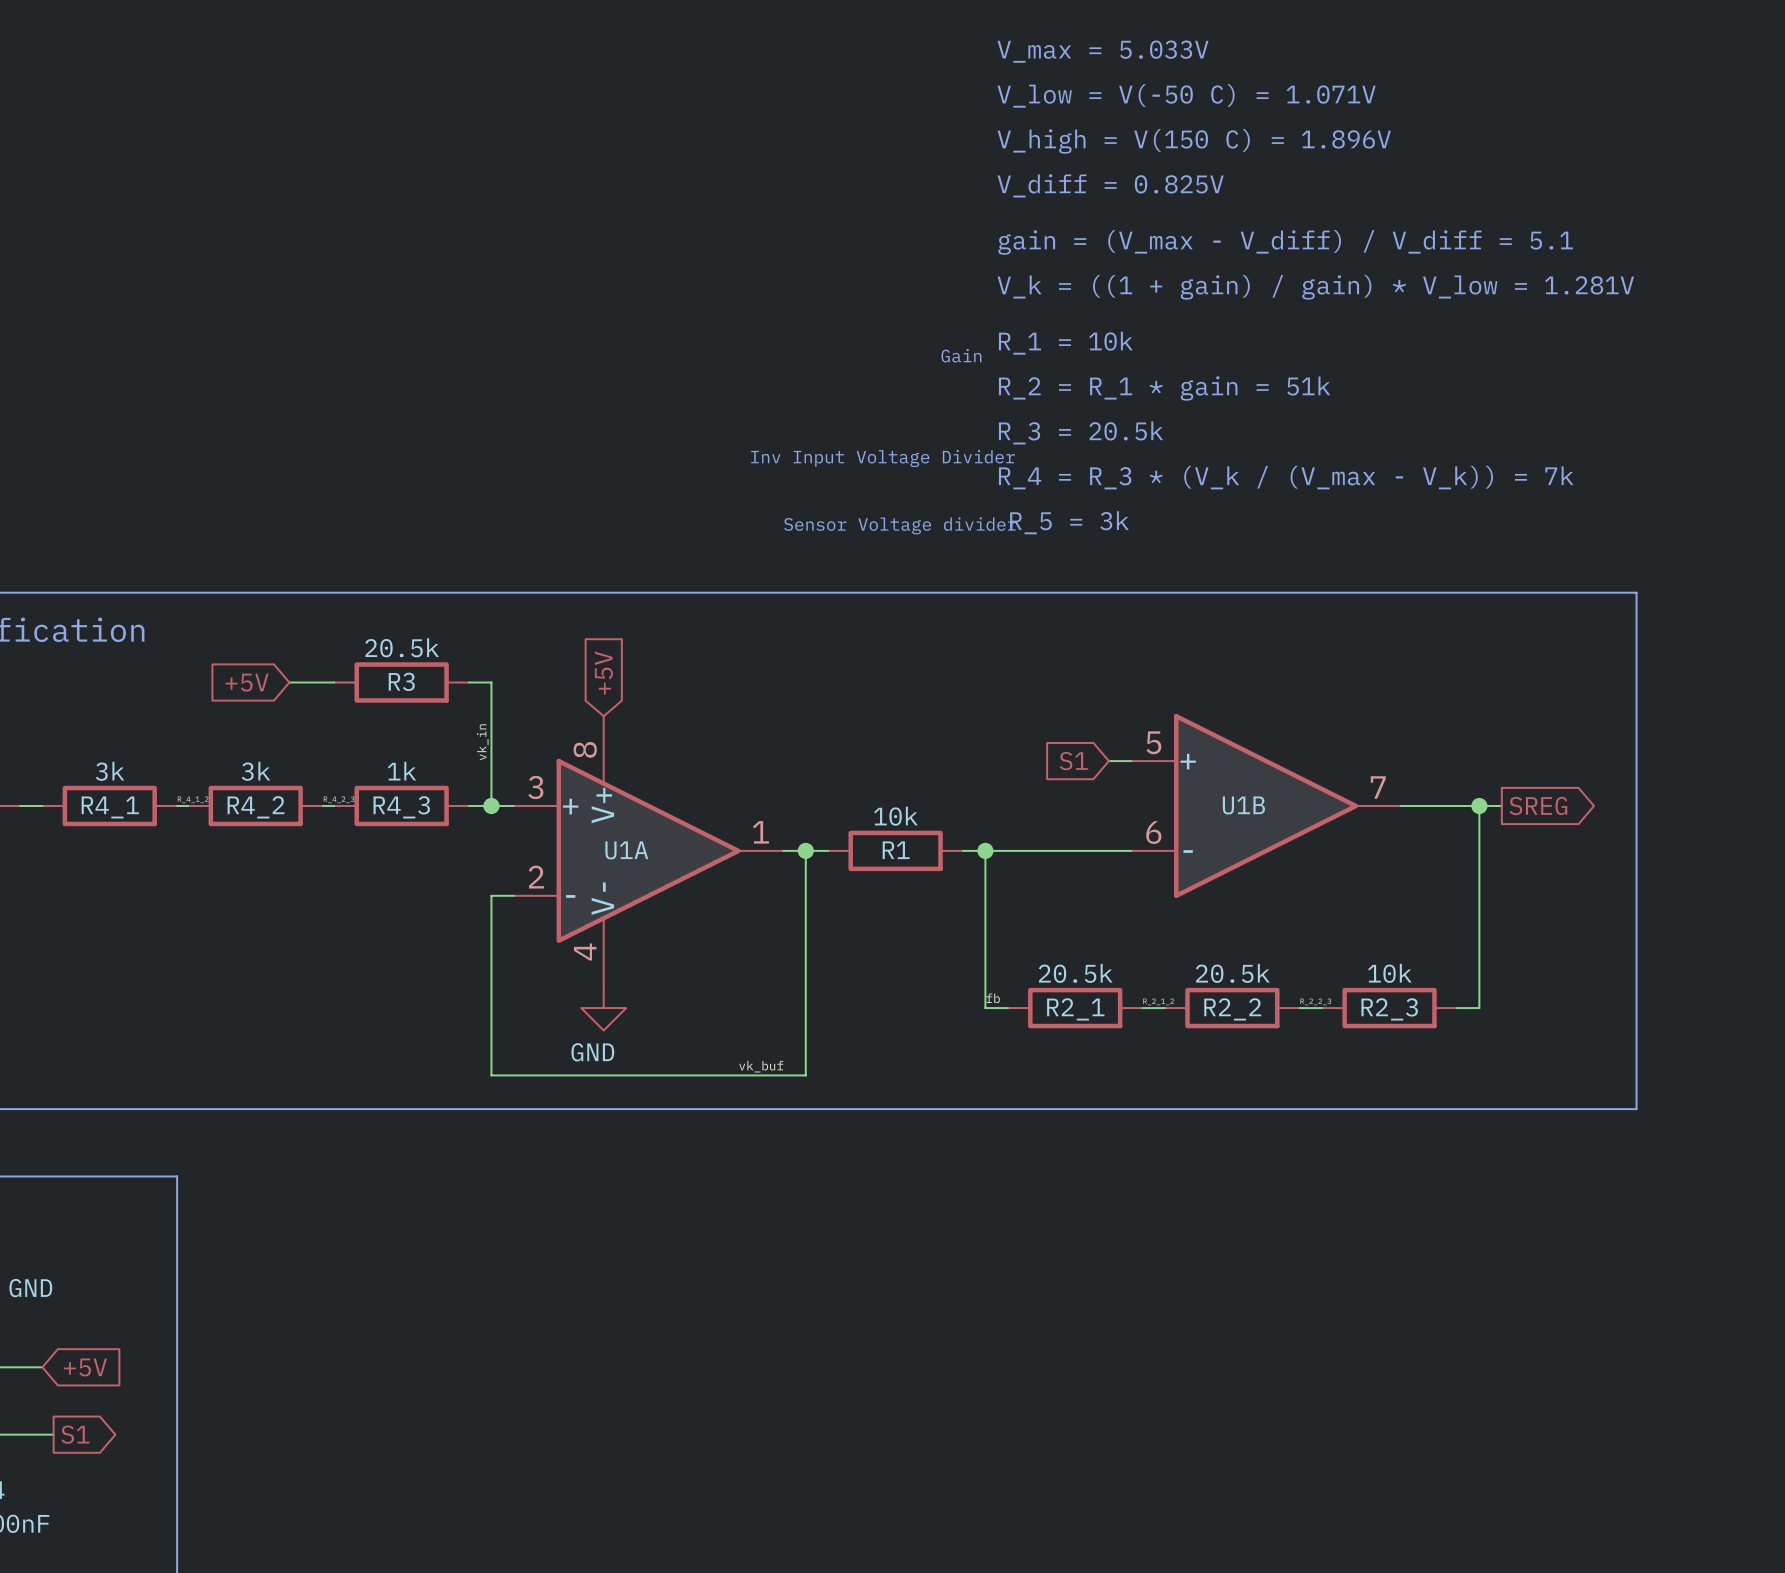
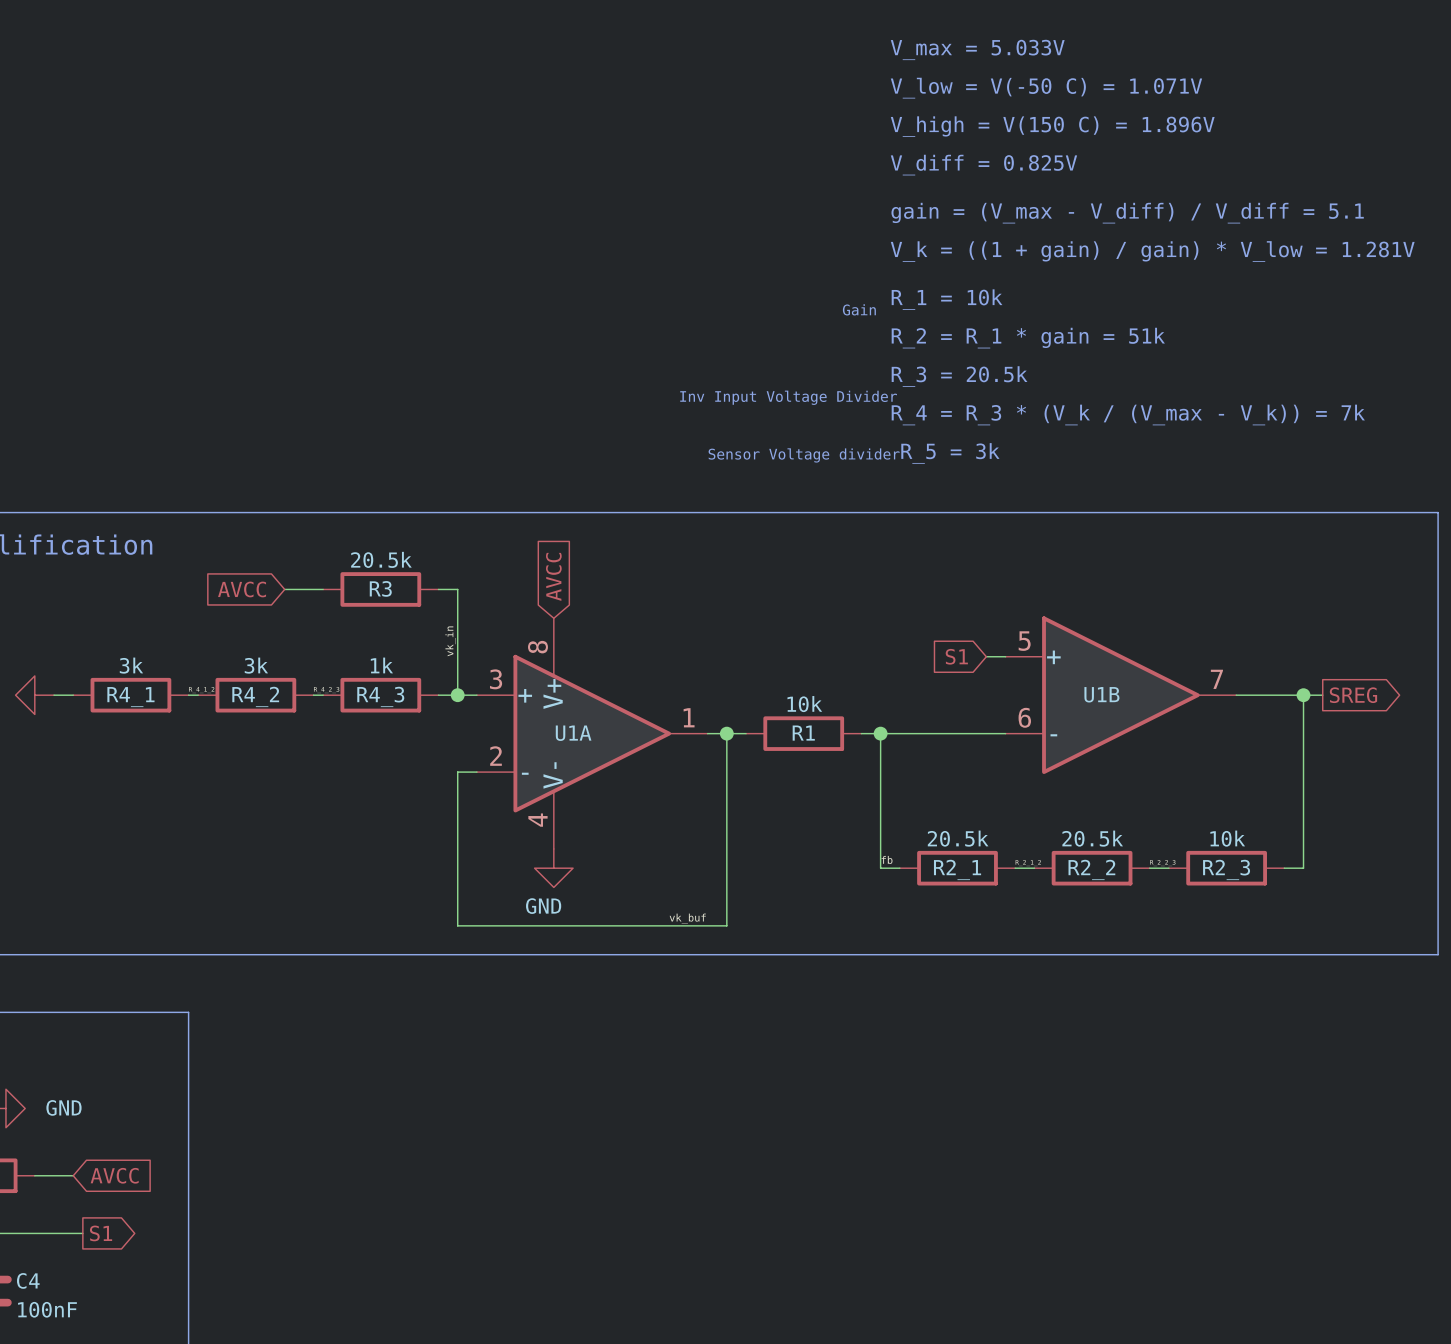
global label: +5V (603, 673) -> AVCC (553, 576)
global label: +5V (247, 682) -> AVCC (242, 589)
global label: +5V (85, 1367) -> AVCC (114, 1175)

